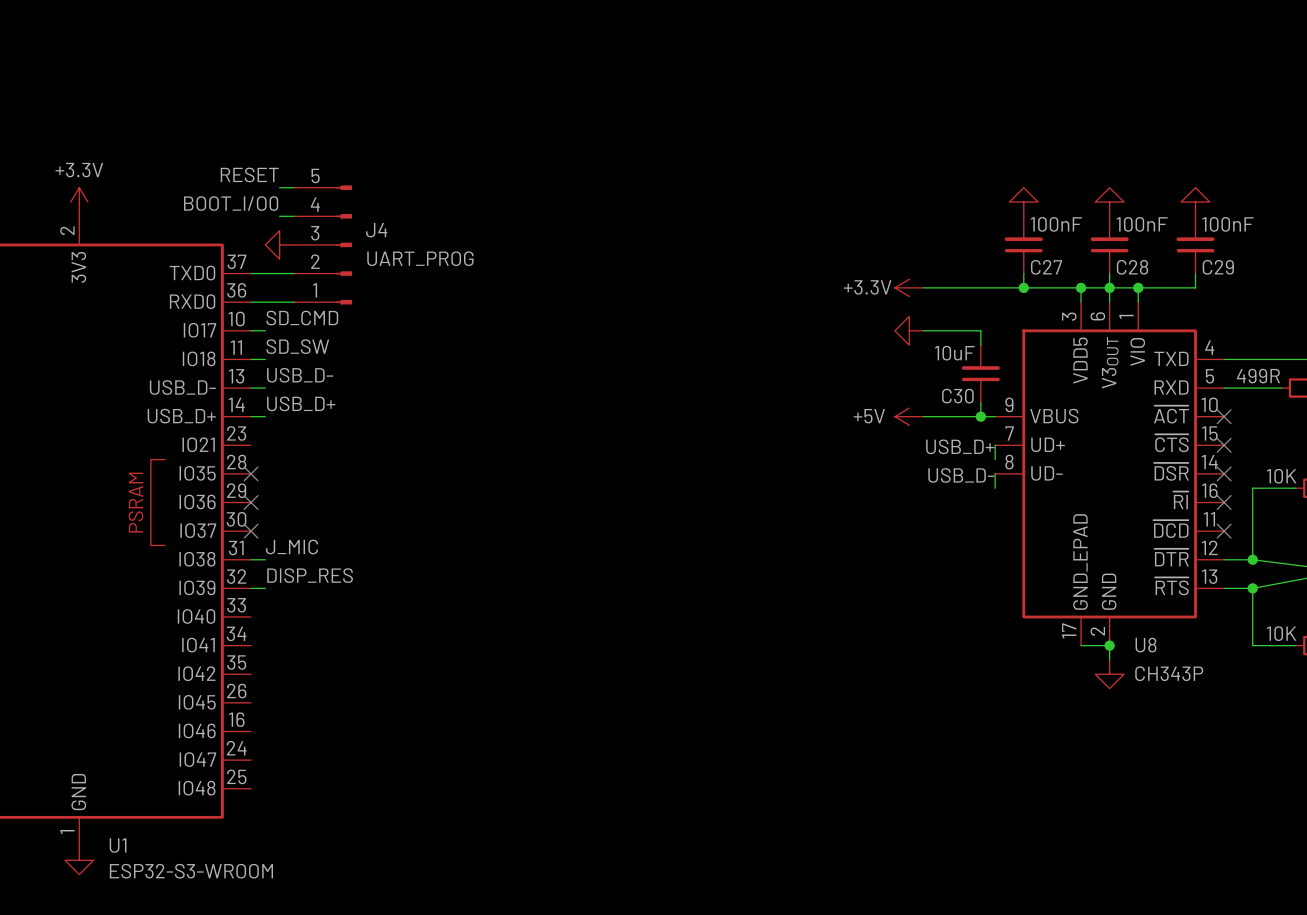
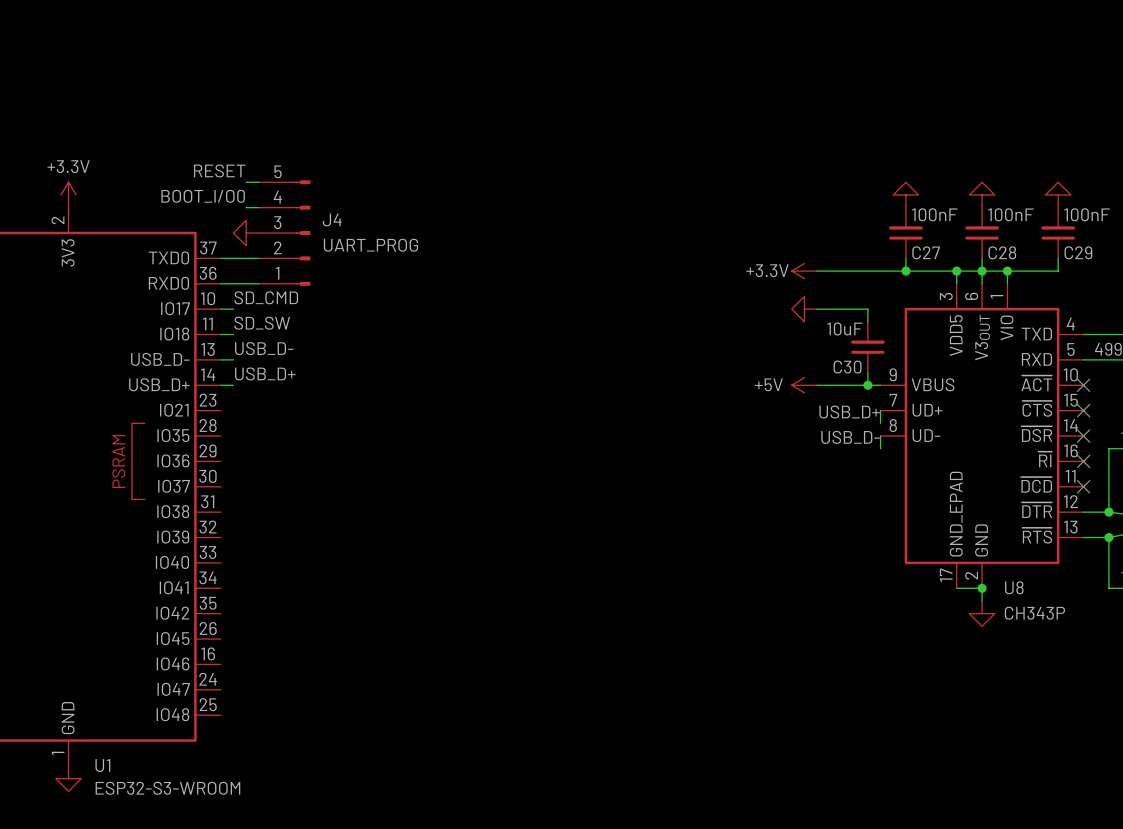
no-connect mark: (251, 473) -> none
no-connect mark: (251, 502) -> none
no-connect mark: (251, 531) -> none
label: J_MIC (291, 547) -> none
wire: (251, 559) (265, 559) -> none
label: DISP_RES (310, 575) -> none
wire: (251, 588) (265, 588) -> none

